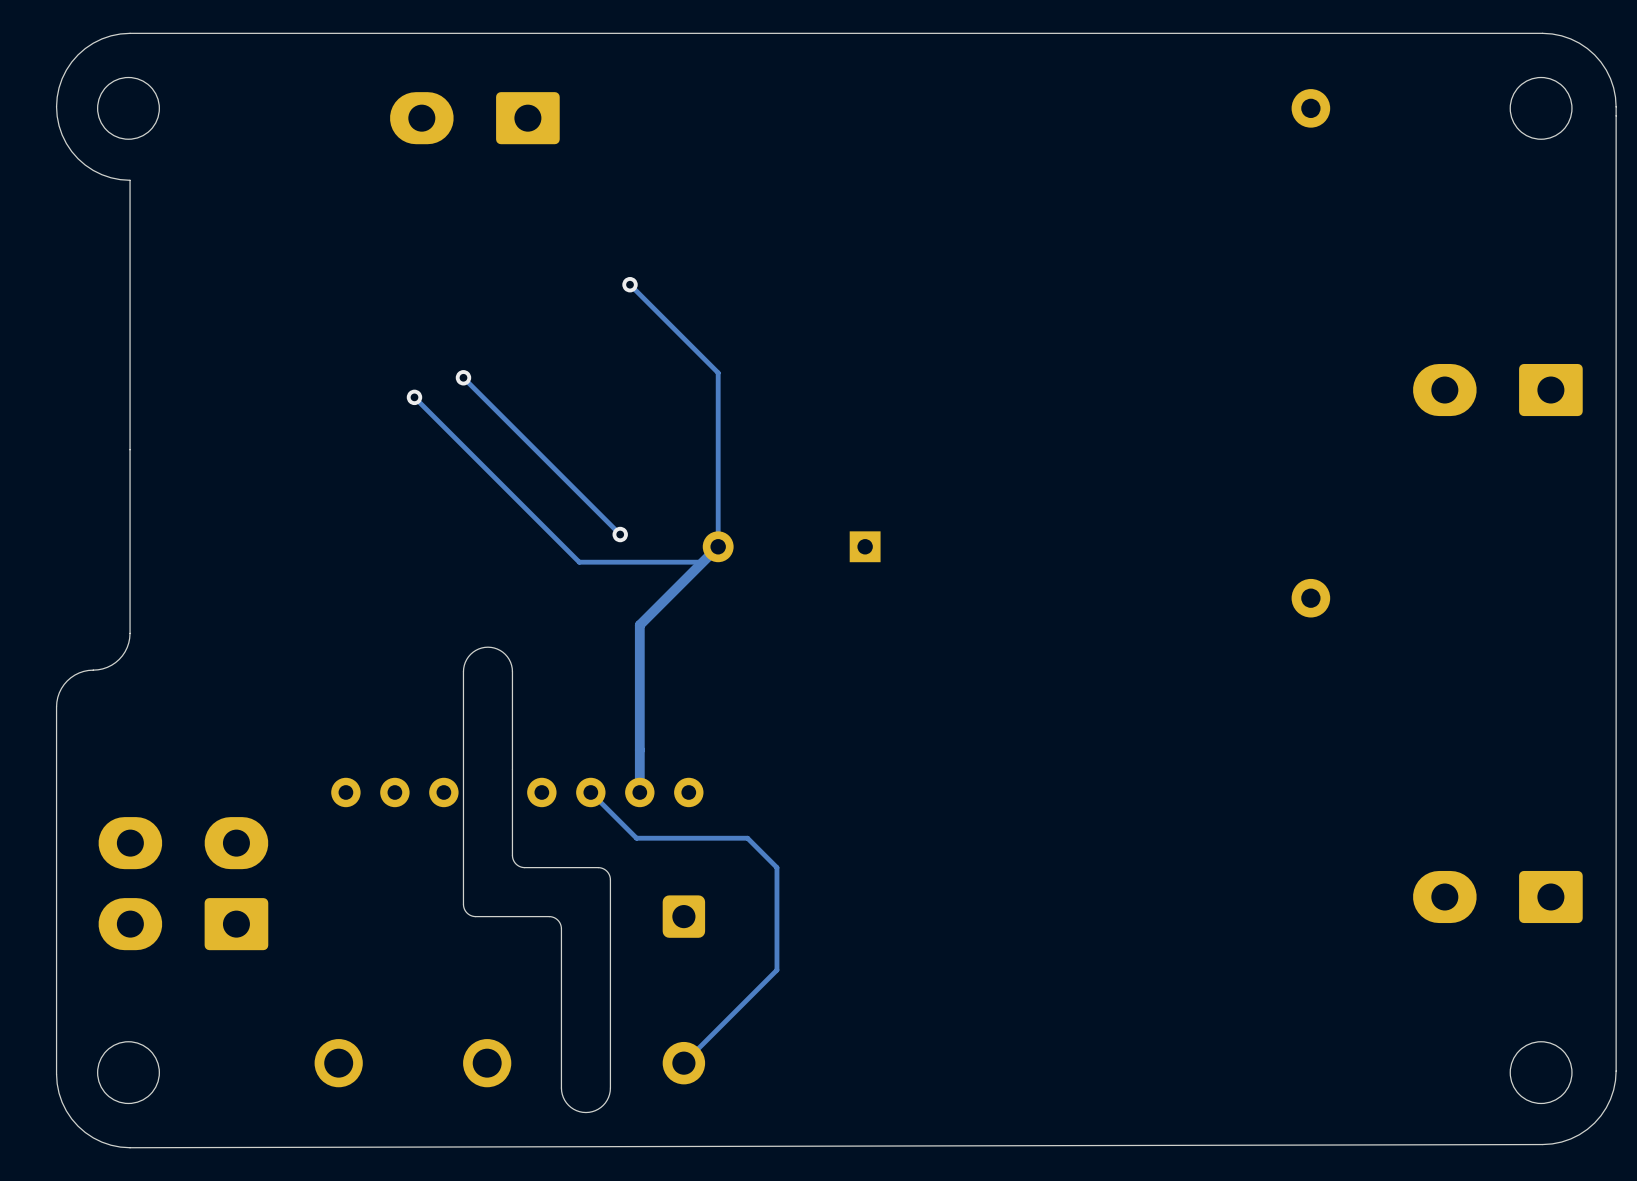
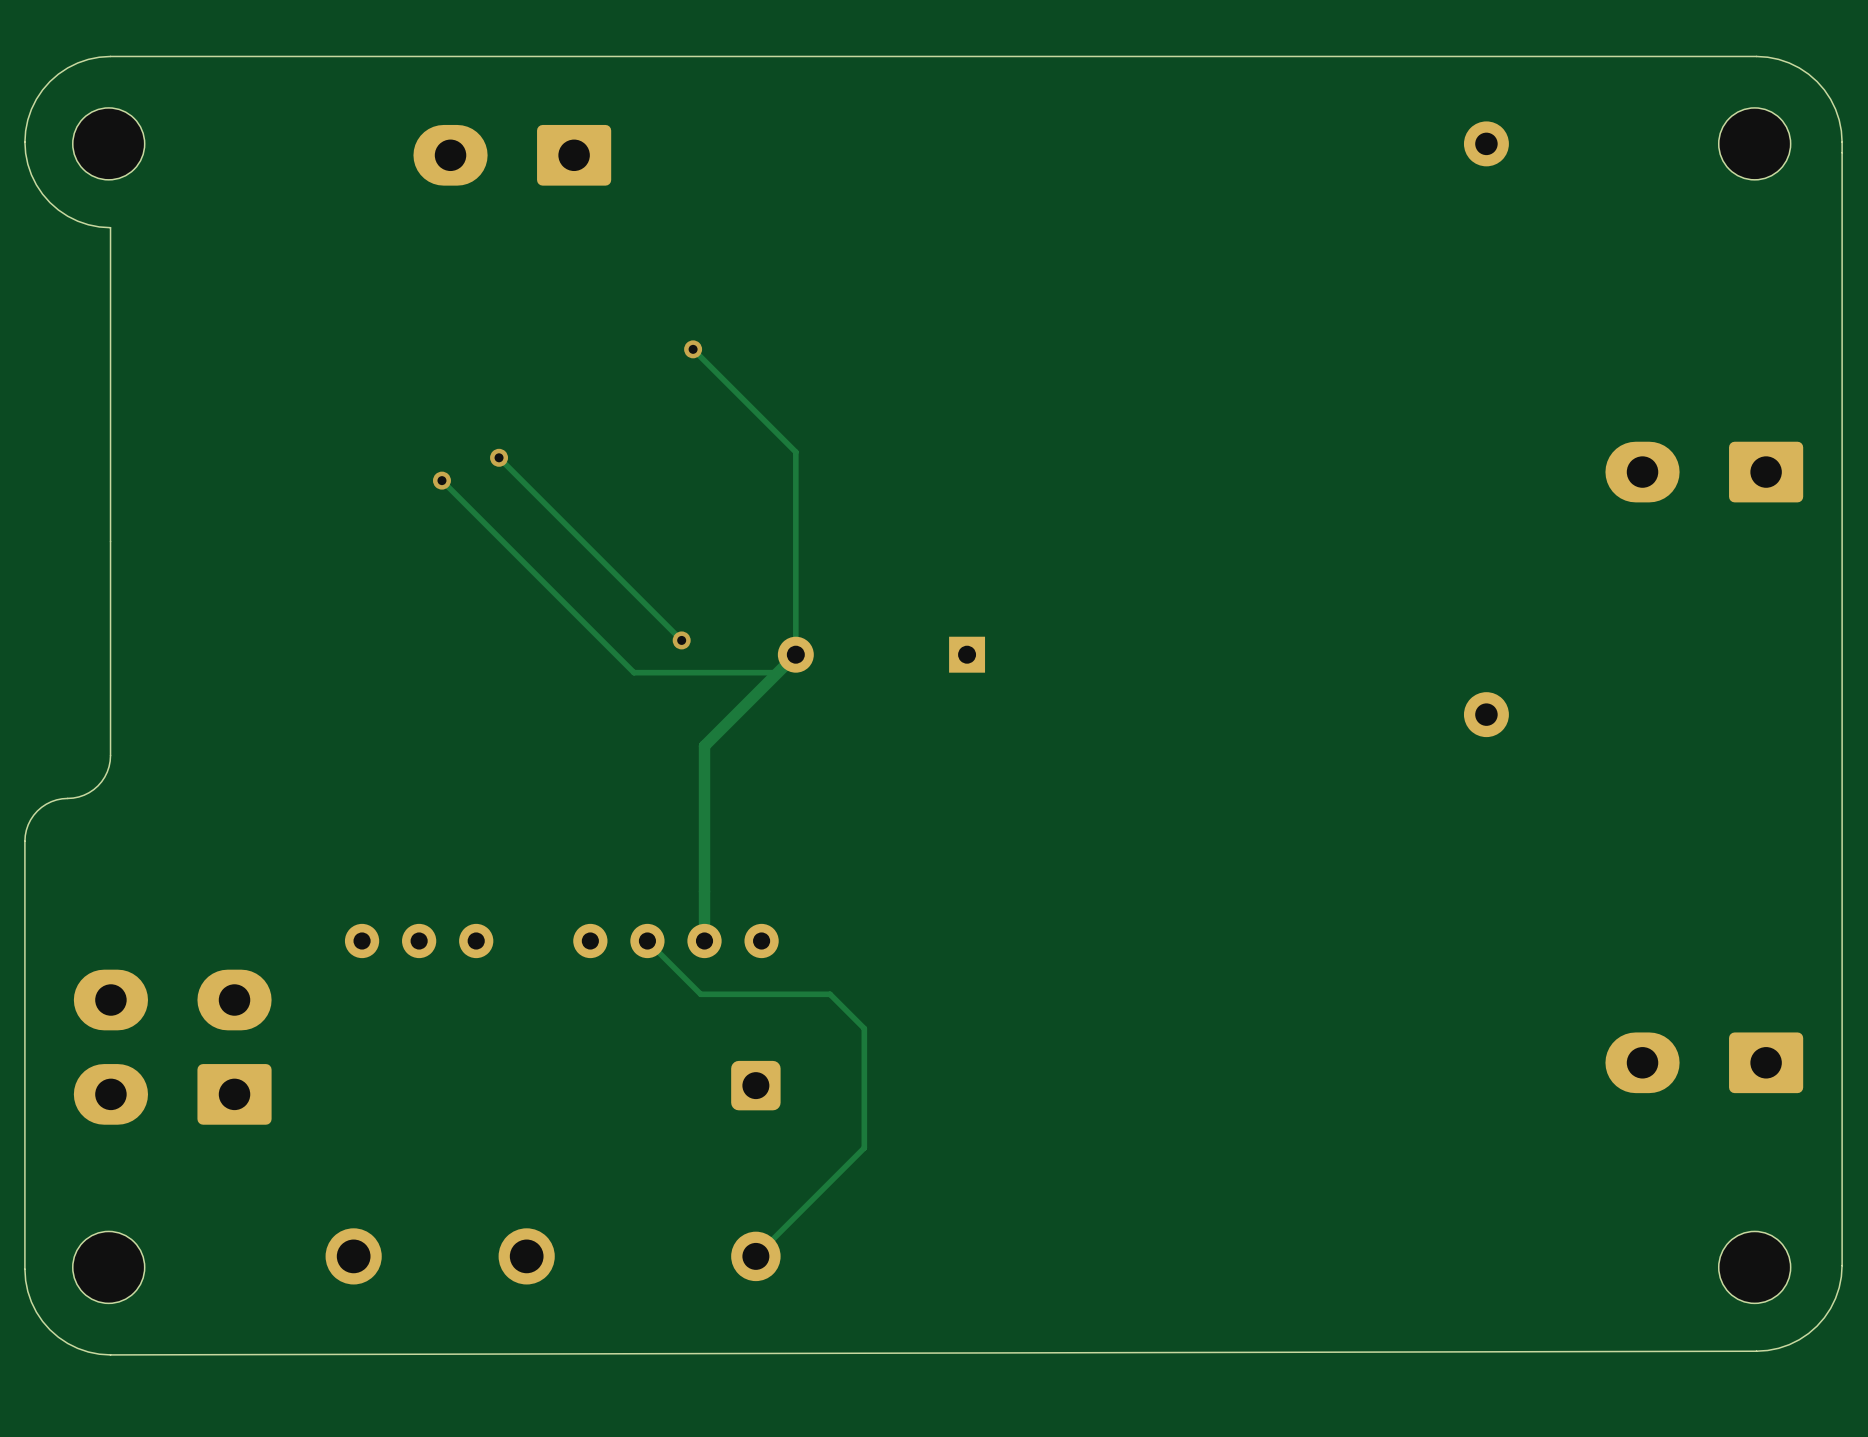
board edge: (512, 671) (513, 860) (517, 865) (523, 867) (599, 867) (606, 871) (610, 878) (610, 1091) (603, 1105) (589, 1112) (579, 1111) (571, 1107) (564, 1100) (561, 1091) (561, 928) (559, 922) (550, 916) (474, 916) (467, 913) (463, 905) (464, 665) (468, 656) (475, 650) (491, 647) (500, 650) (507, 656) (512, 671) -> none

